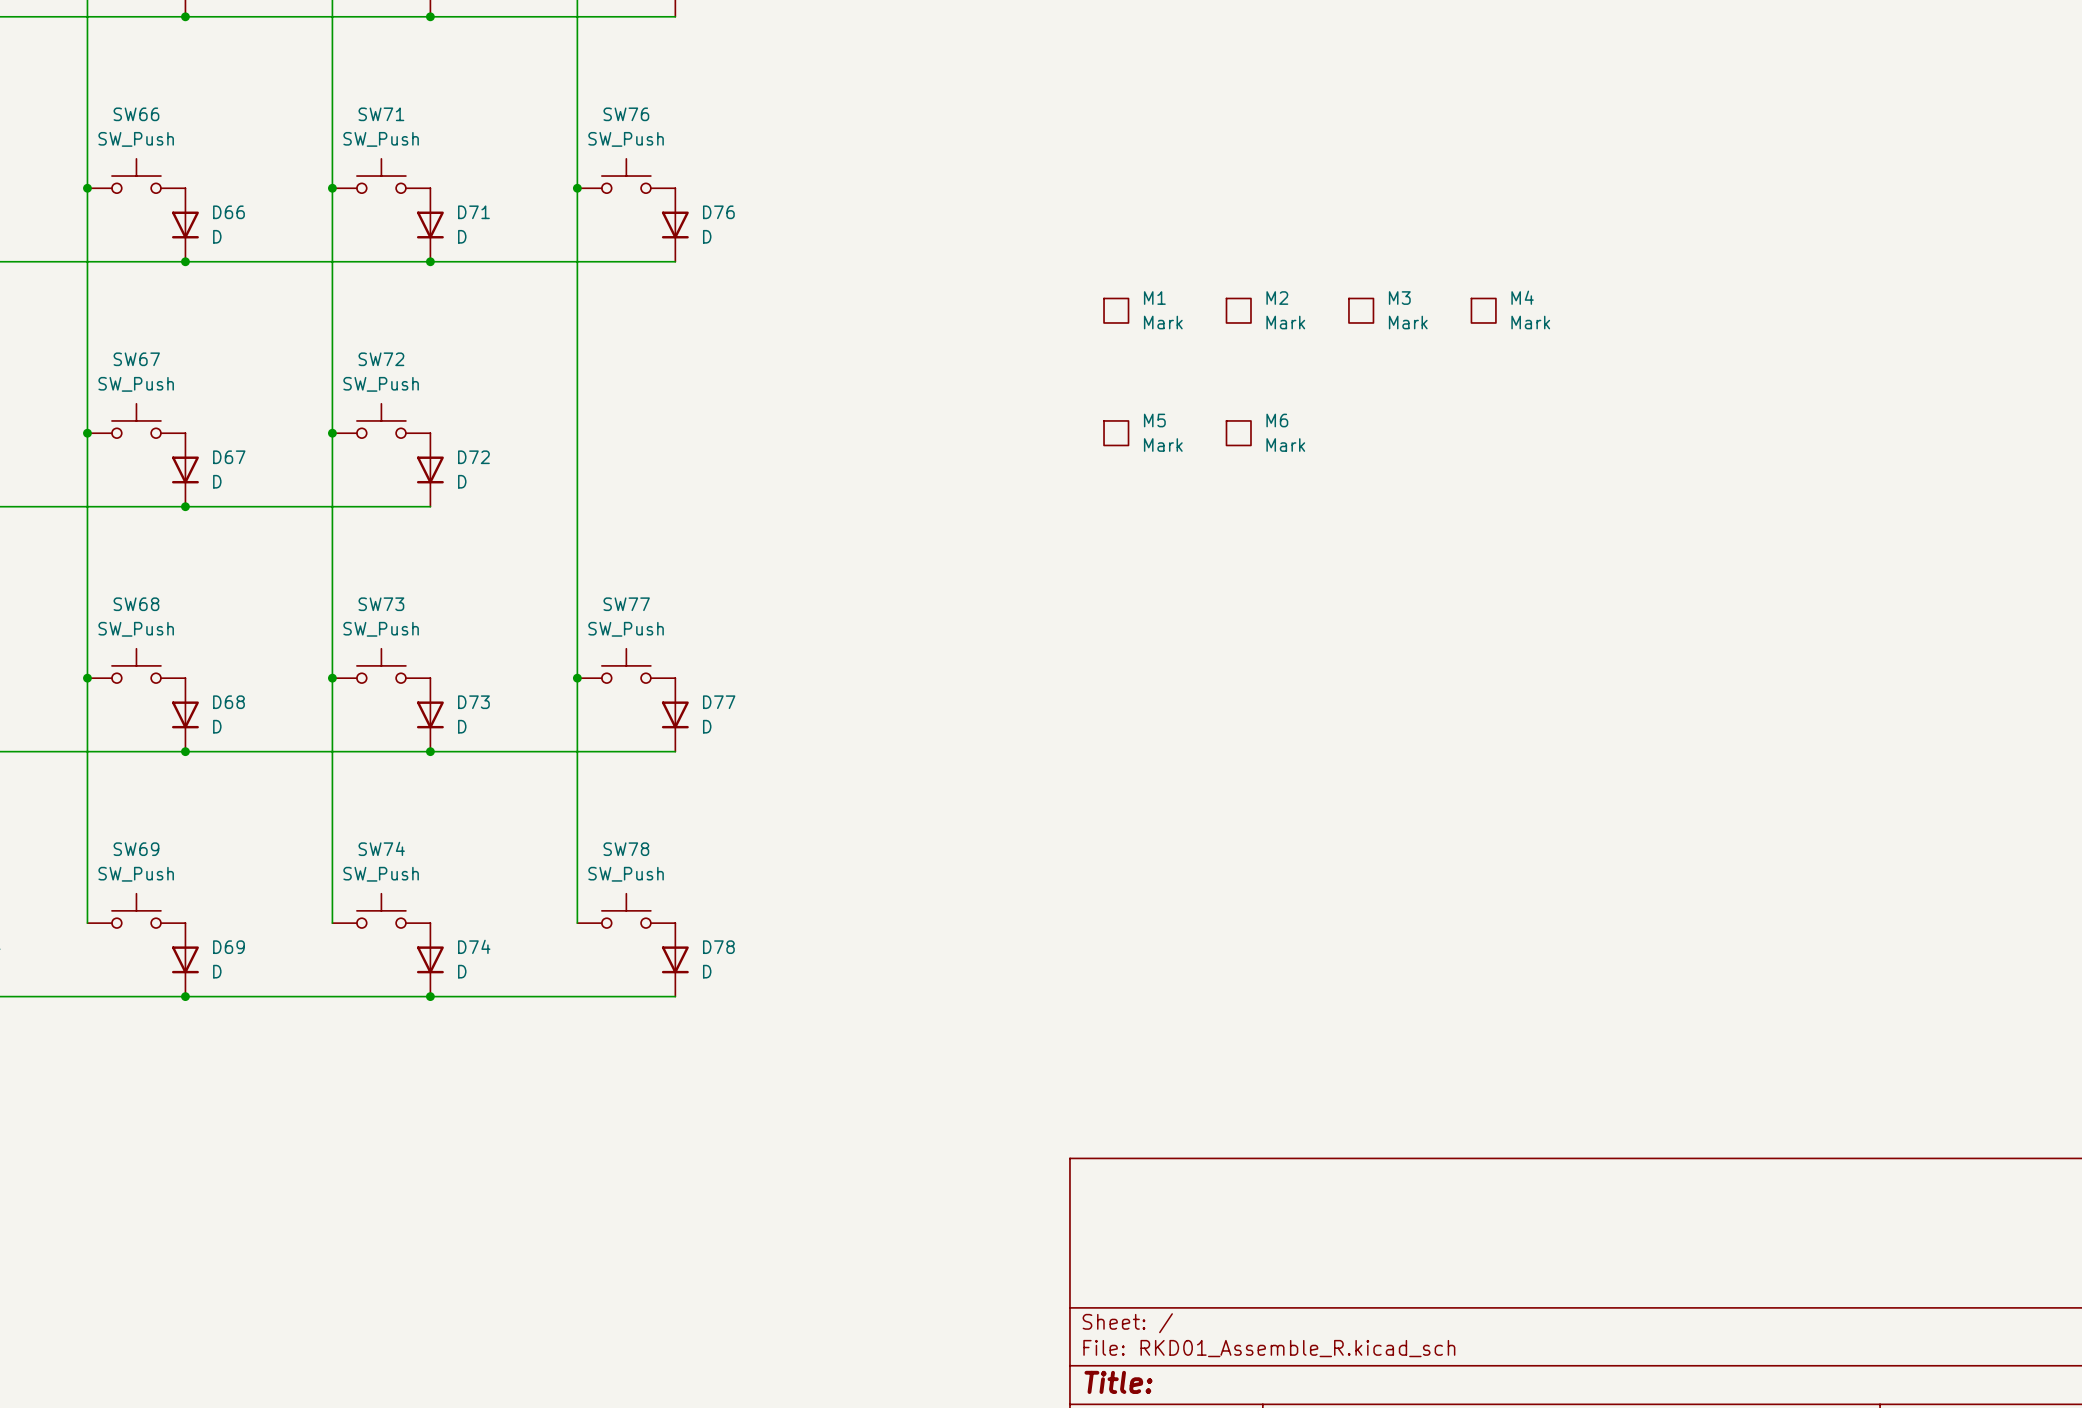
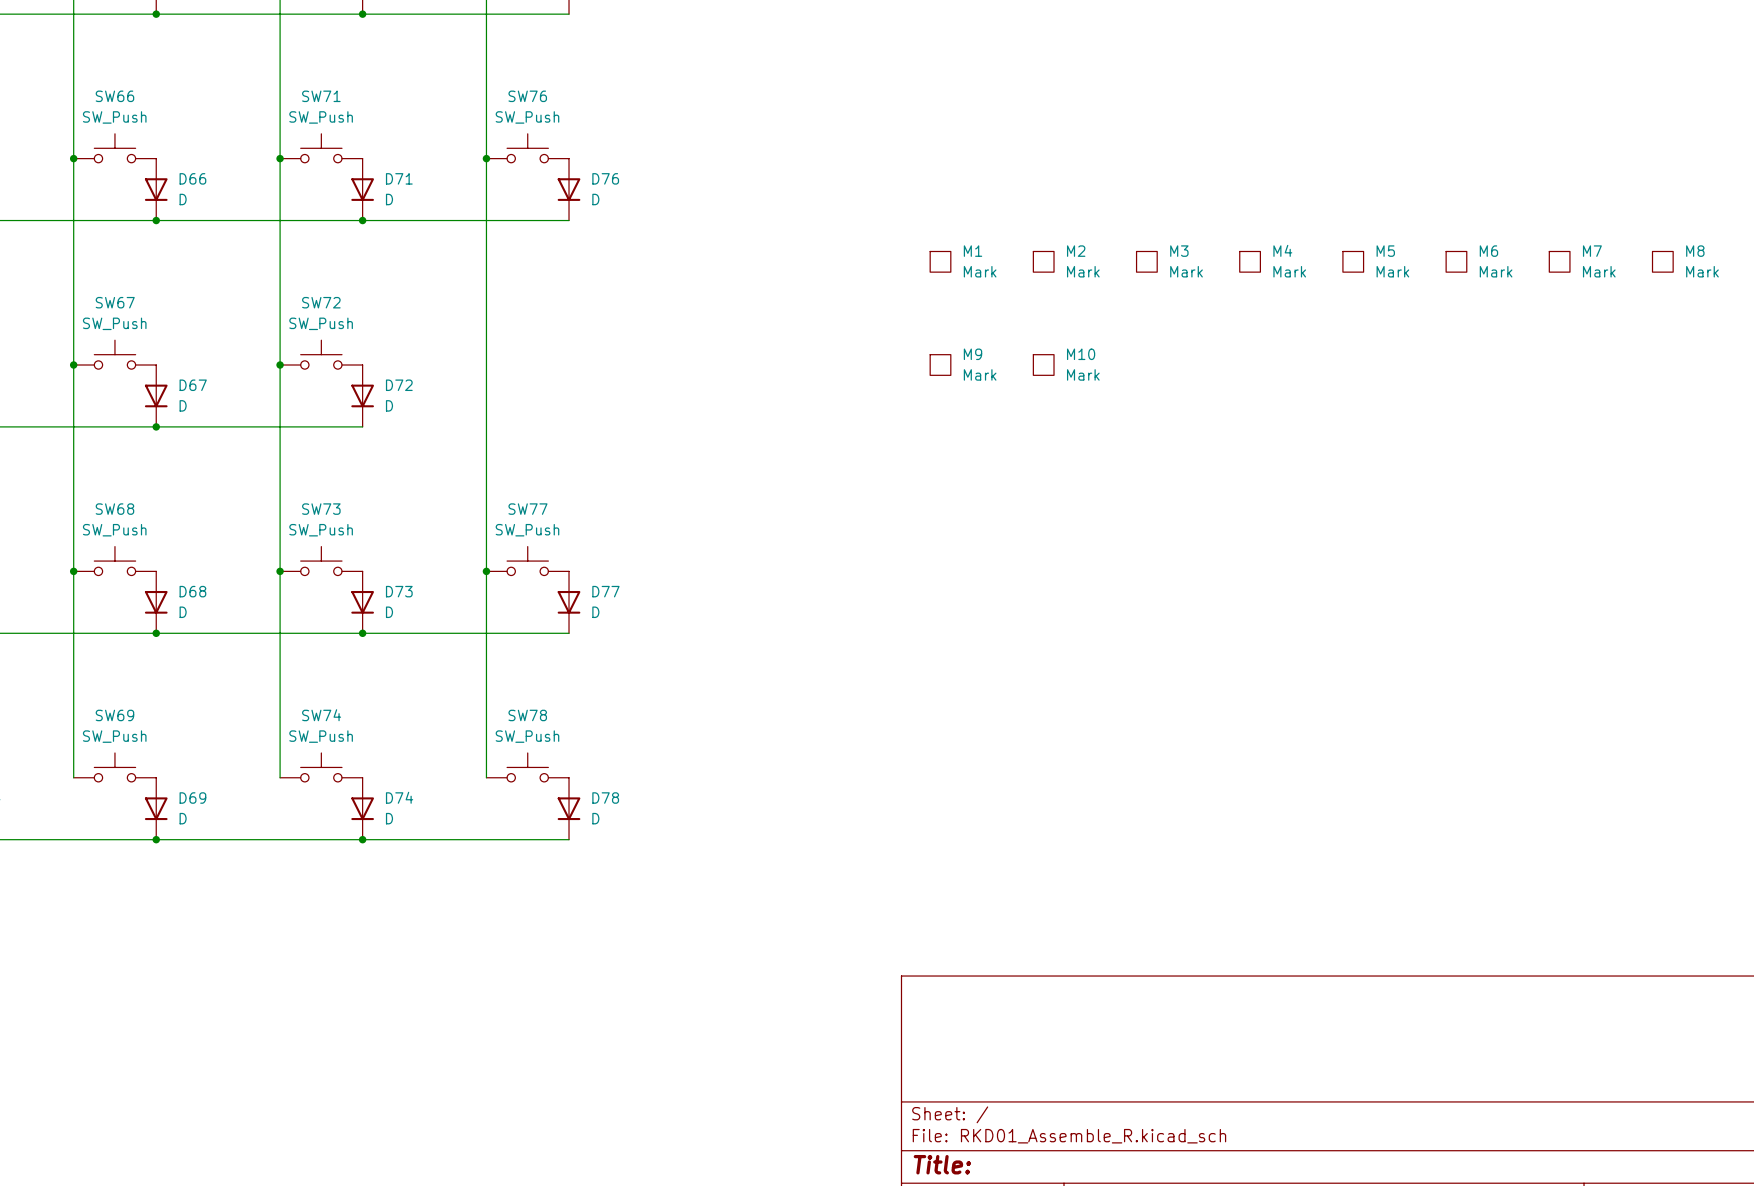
M5: none -> Mark (1353, 261)
M6: none -> Mark (1456, 261)
M7: none -> Mark (1559, 261)
M8: none -> Mark (1662, 261)
M5 name: M5 (1154, 420) -> M9 (973, 354)
M6 name: M6 (1277, 420) -> M10 (1081, 354)

